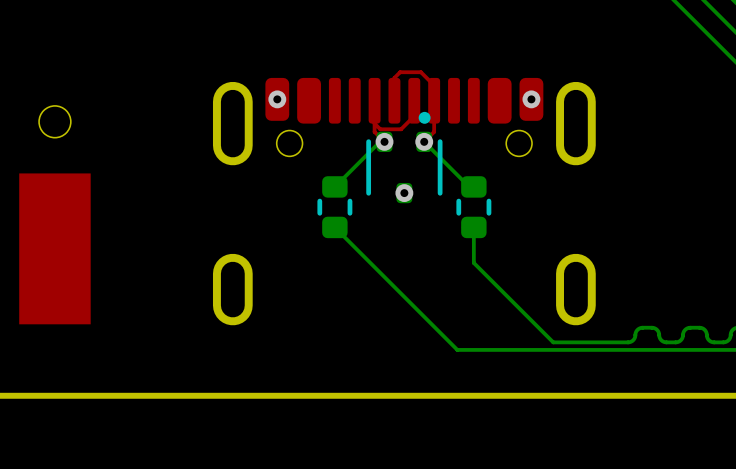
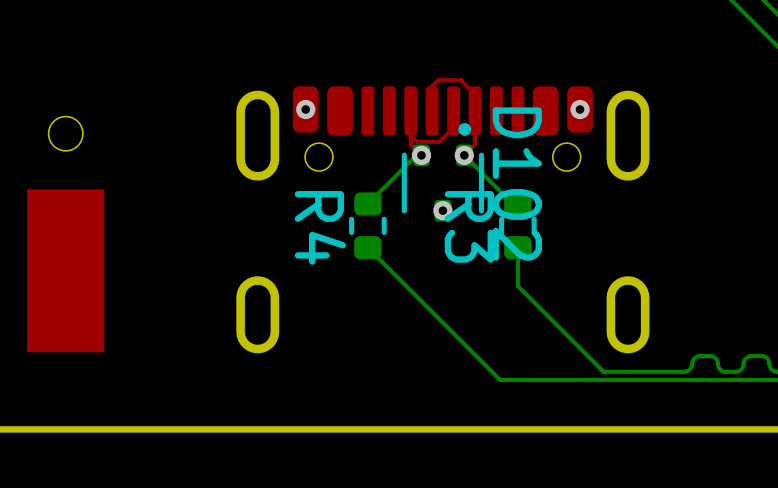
D102 name: none -> D102 (517, 184)
R3 name: none -> R3 (469, 226)
R4 name: none -> R4 (320, 227)

